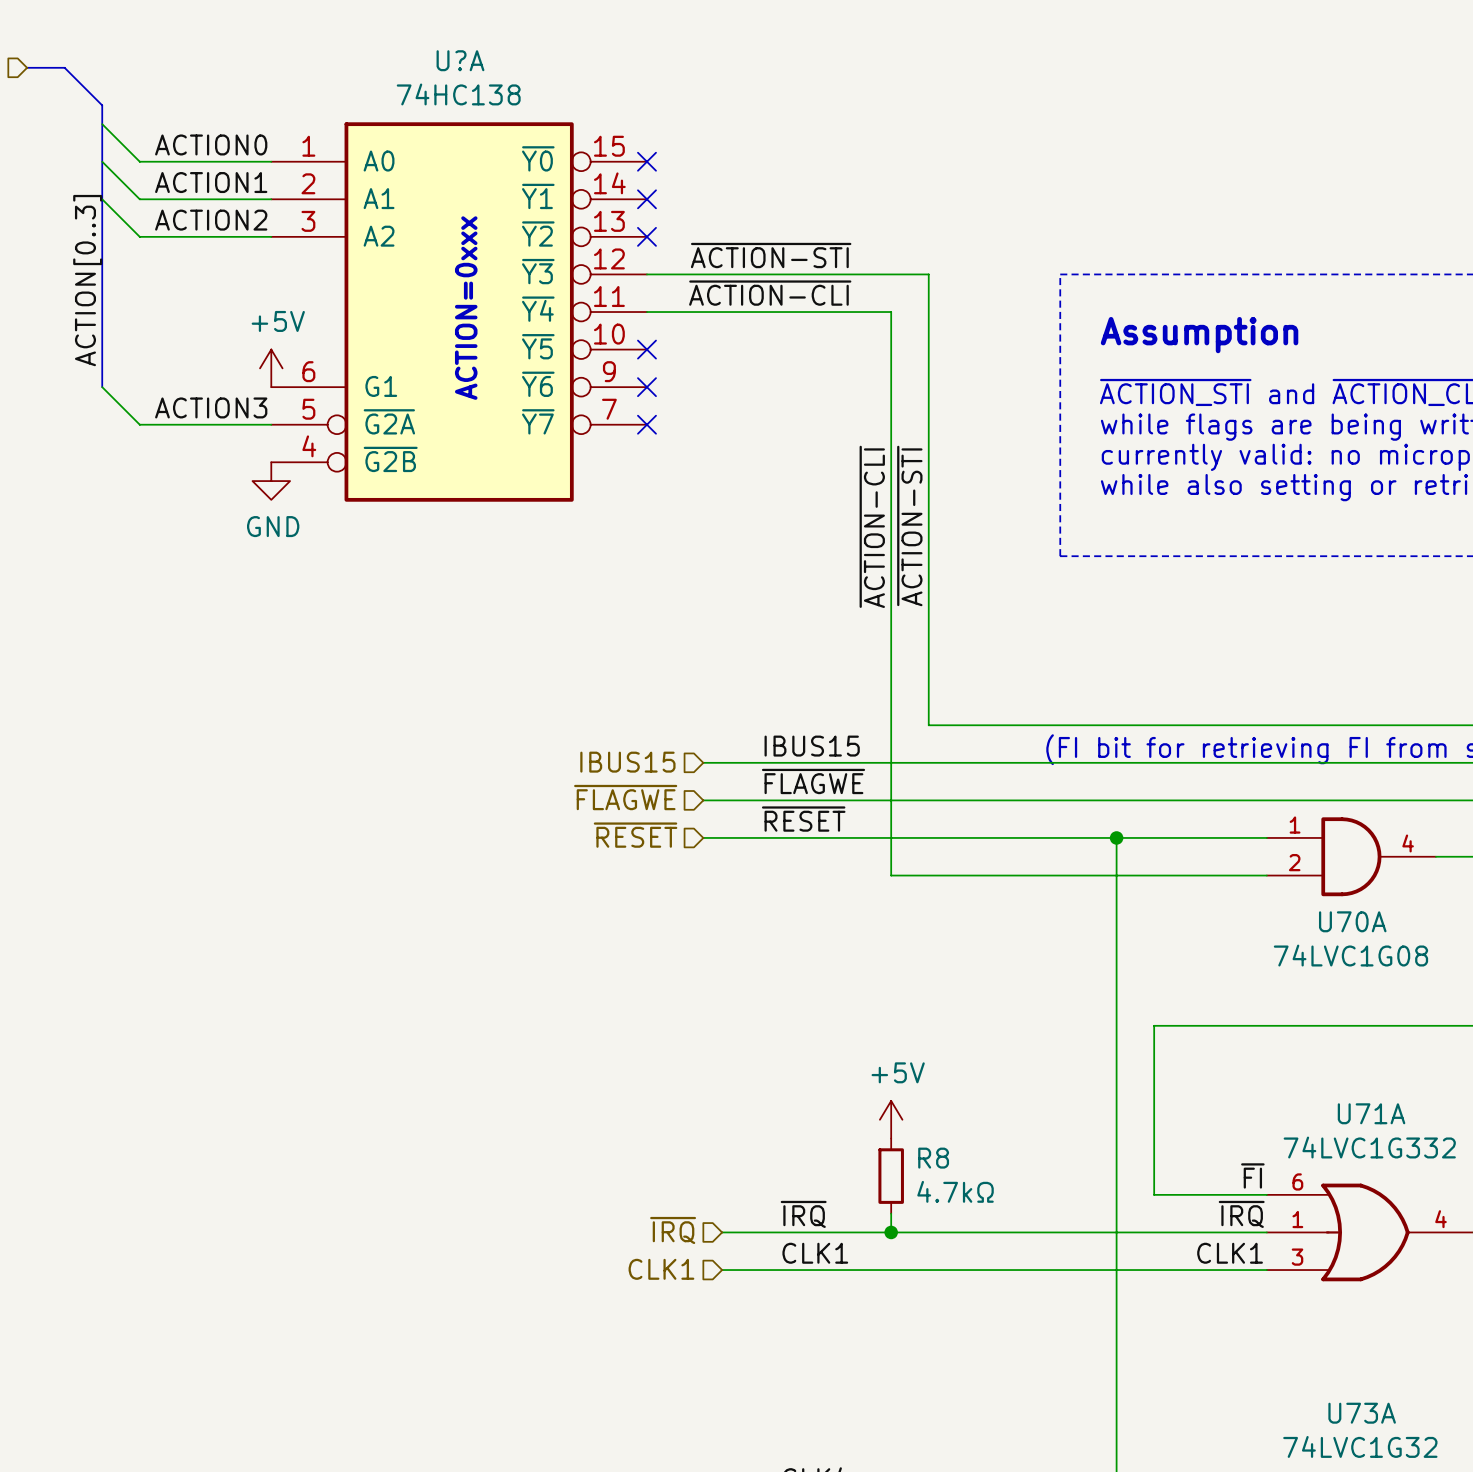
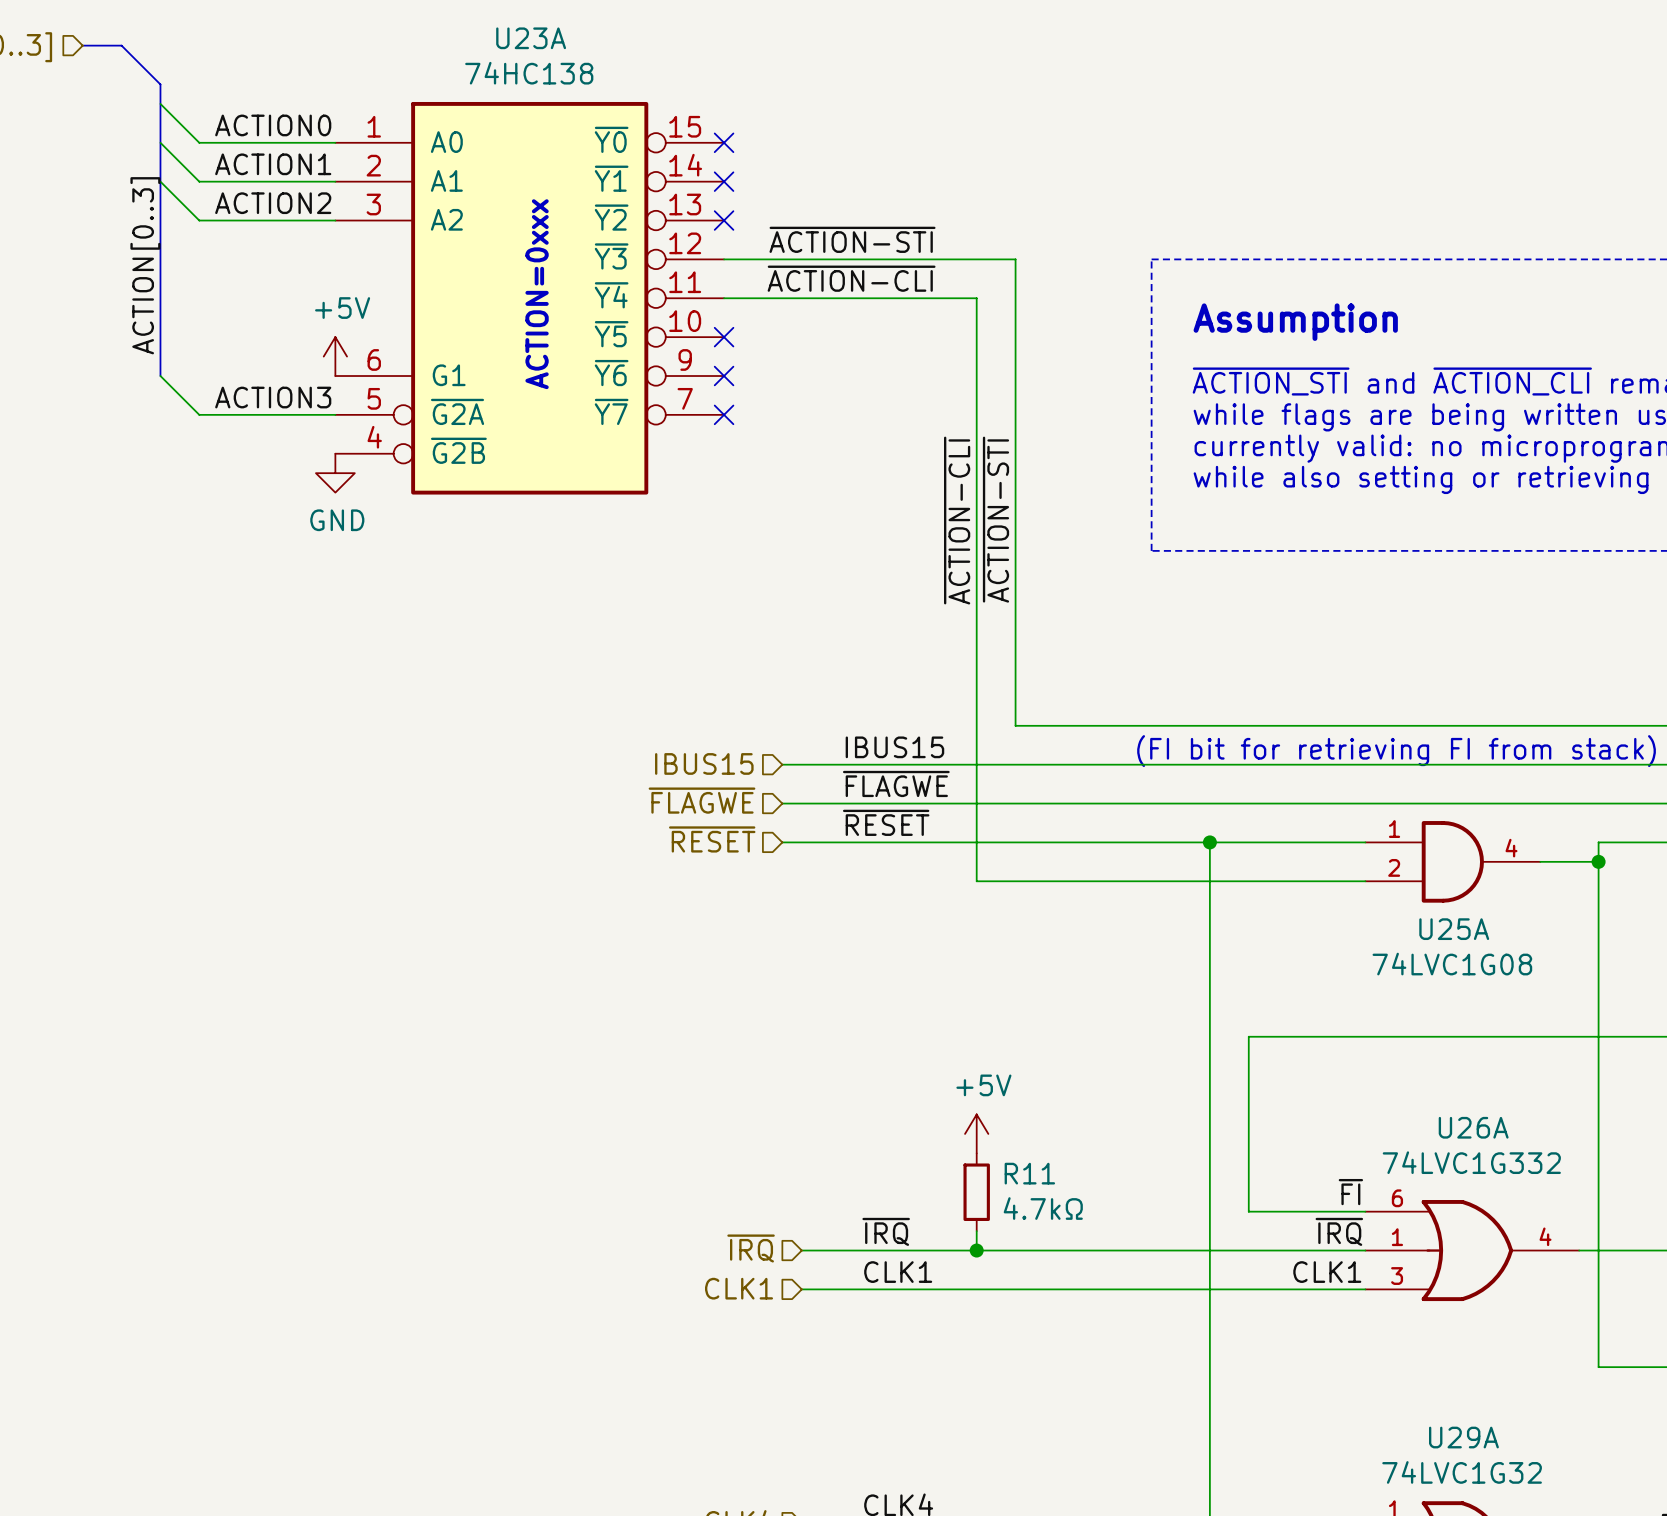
U?A name: U?A (460, 60) -> U23A (531, 38)
U70A name: U70A (1352, 921) -> U25A (1454, 929)
U71A name: U71A (1371, 1113) -> U26A (1473, 1127)
R8 name: R8 (933, 1158) -> R11 (1029, 1173)
U73A name: U73A (1362, 1413) -> U29A (1463, 1437)

